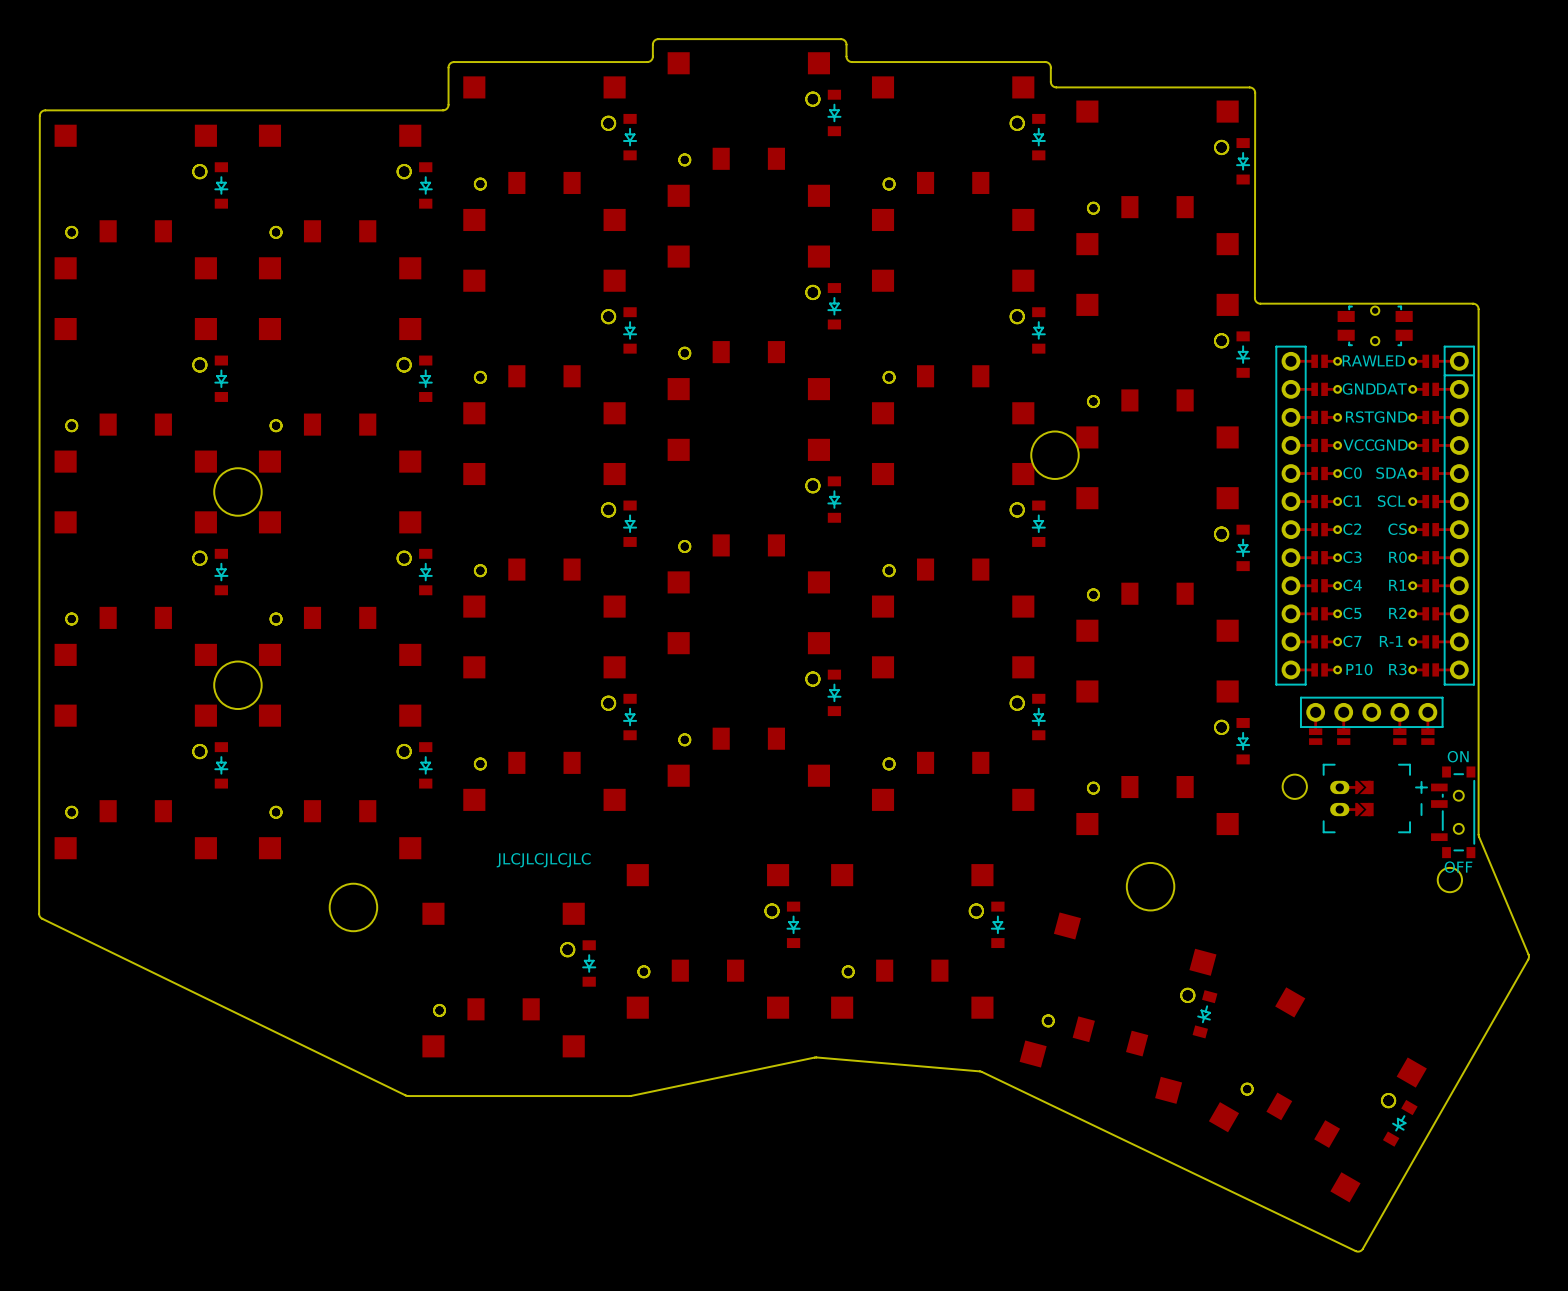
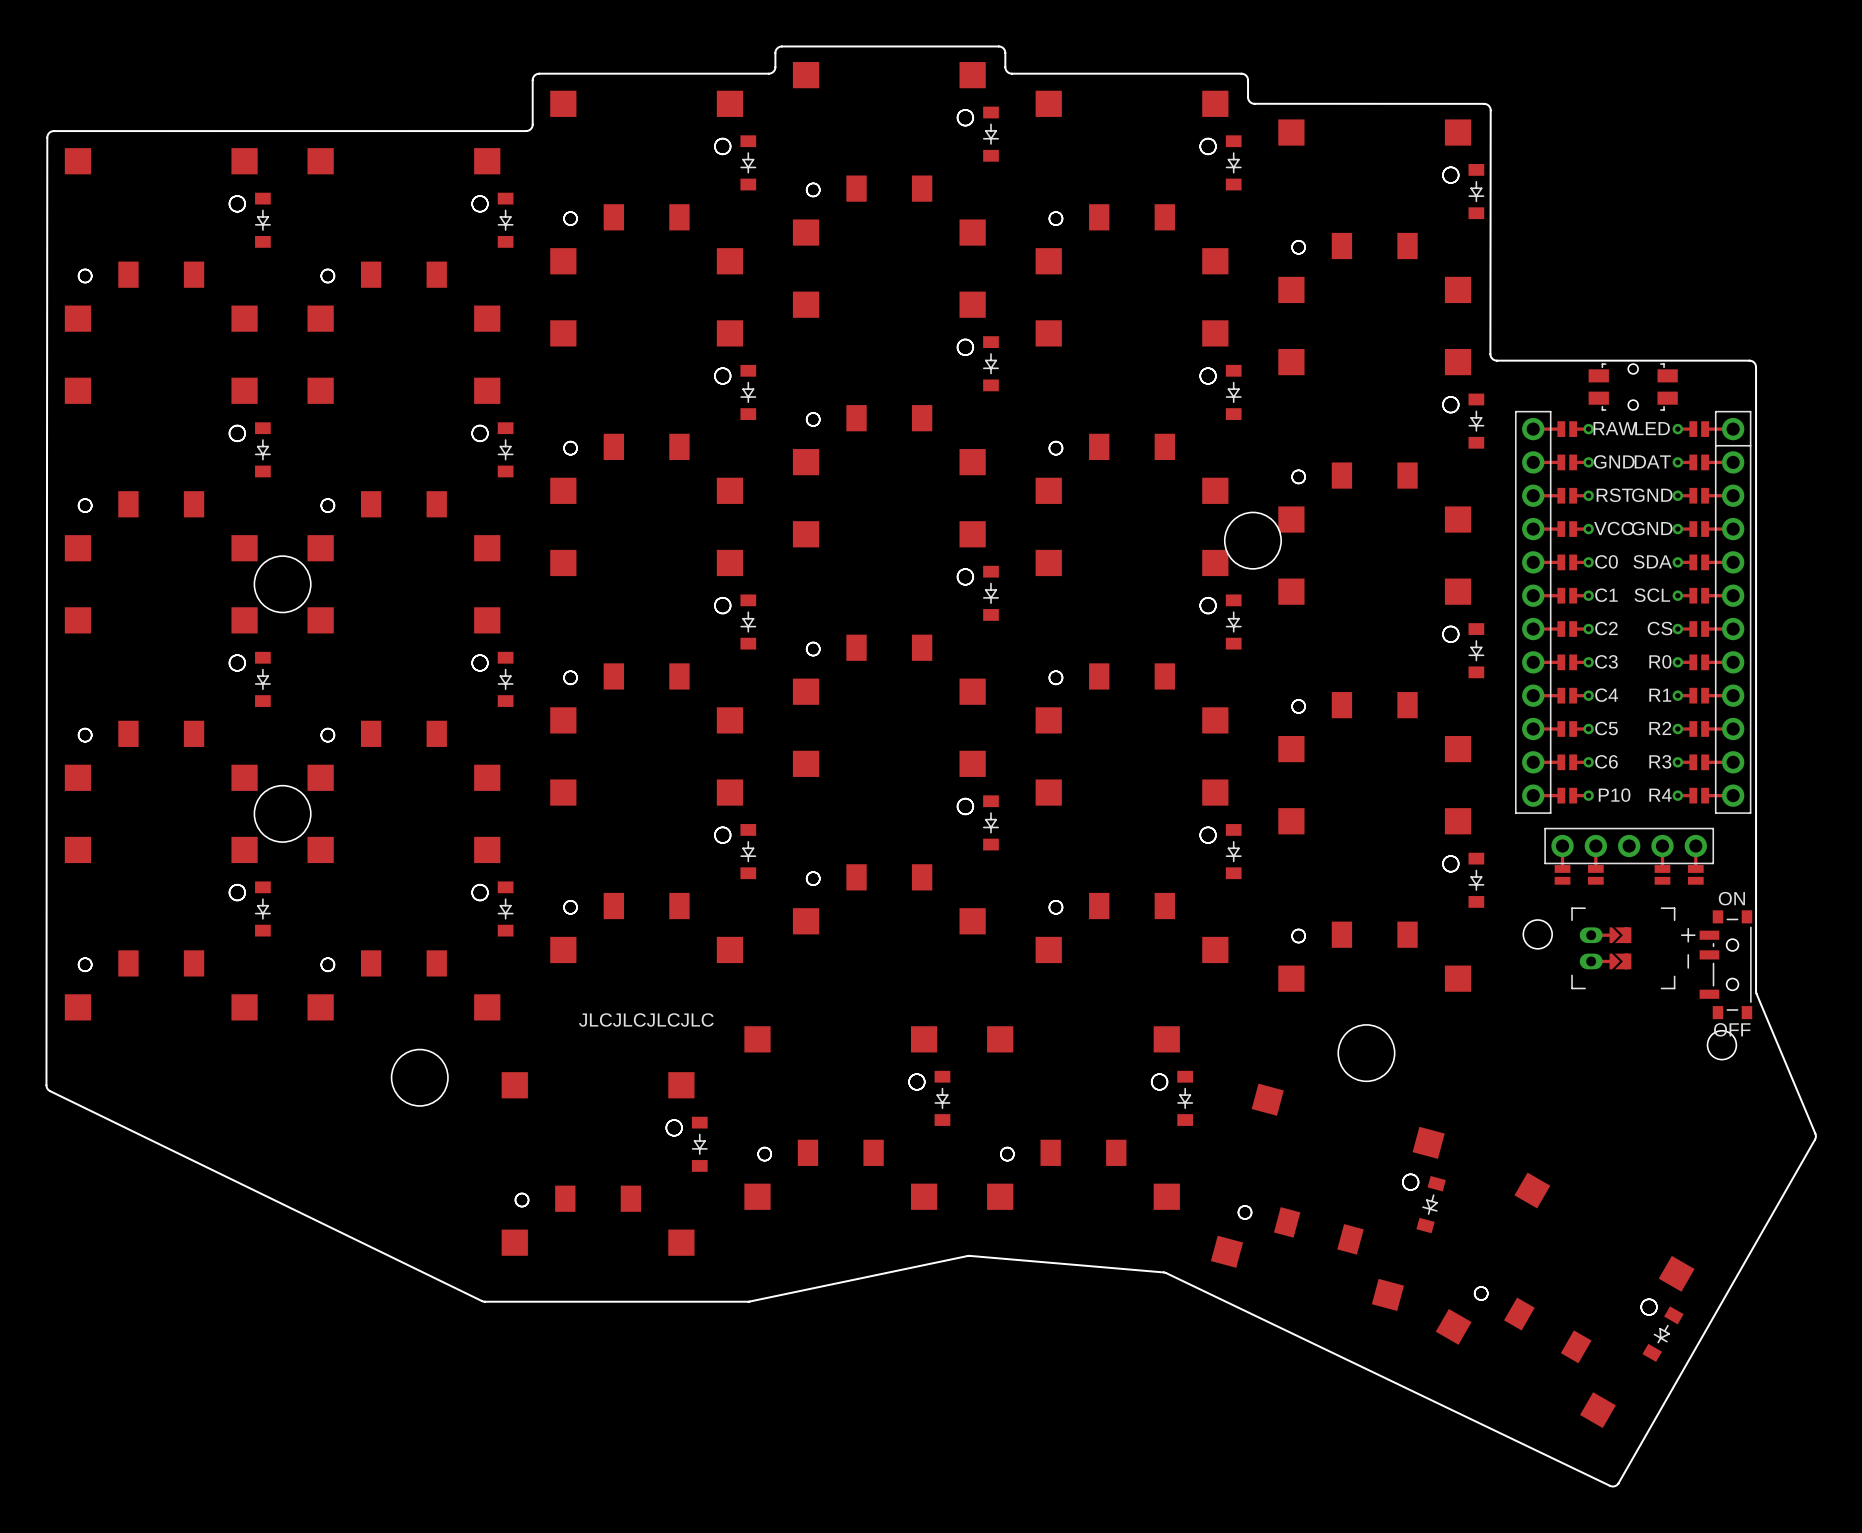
part text: C7 (1352, 641) -> C6 (1606, 761)
part text: R-1 (1391, 641) -> none
part text: none -> R3 (1660, 761)
part text: R3 (1397, 669) -> R4 (1660, 795)

